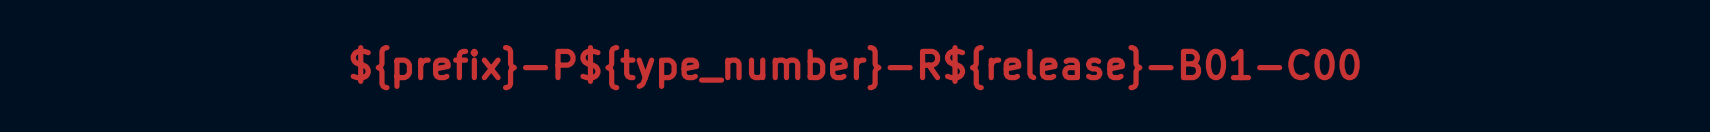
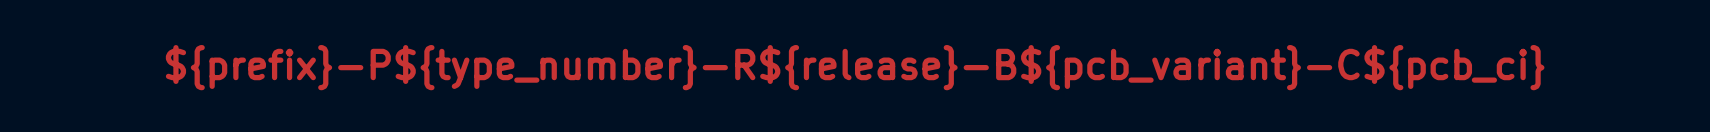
text: ${prefix}-P${type_number}-R${release}-B01-C00 (855, 67) -> ${prefix}-P${type_number}-R${release}-B${pcb_variant}-C${pcb_ci} (855, 67)

